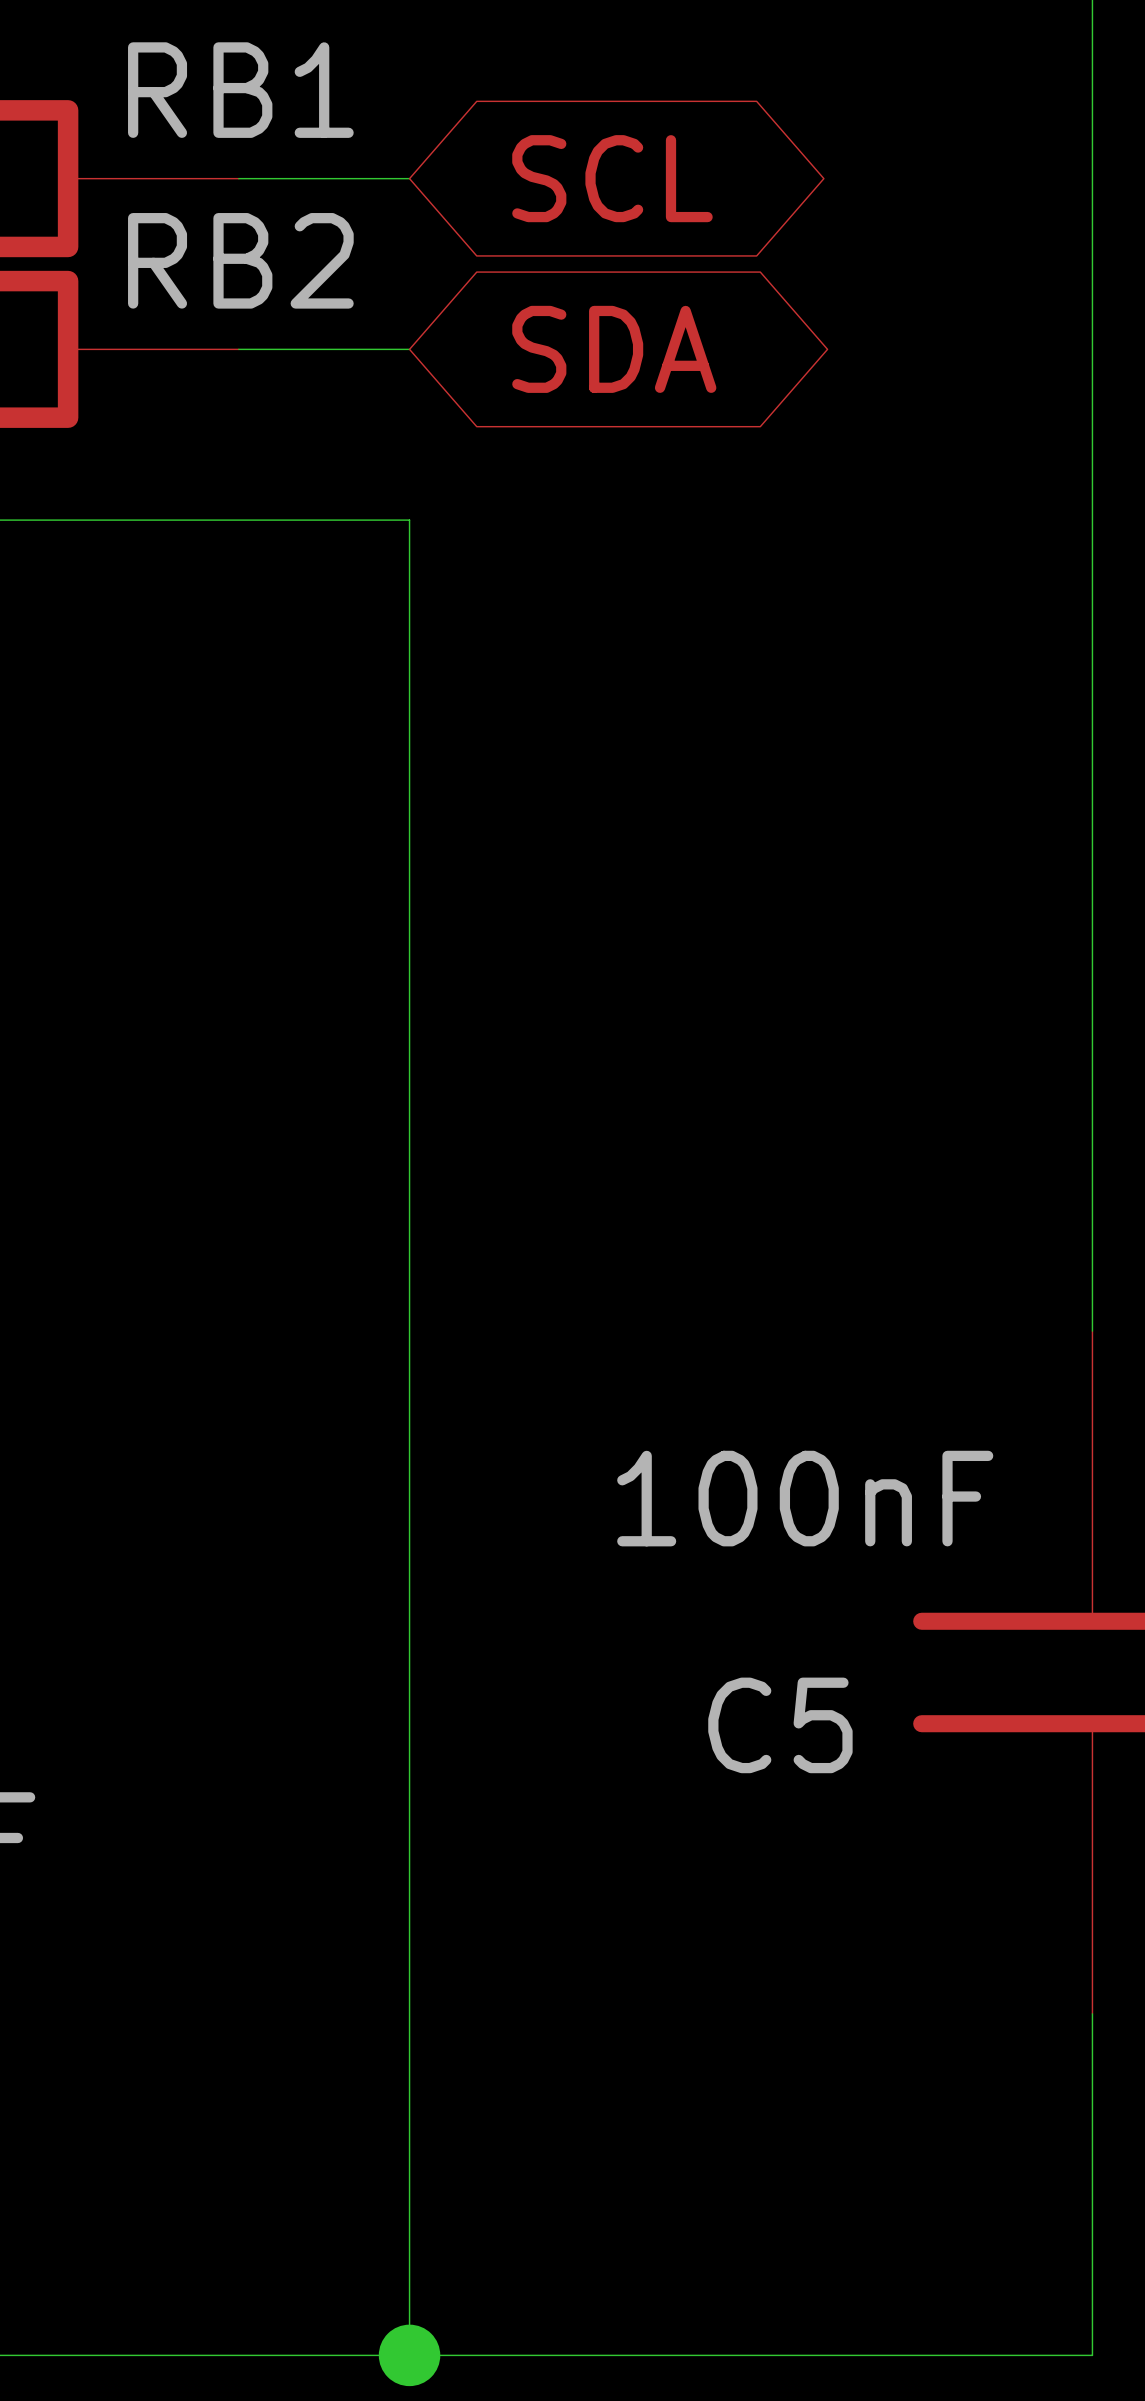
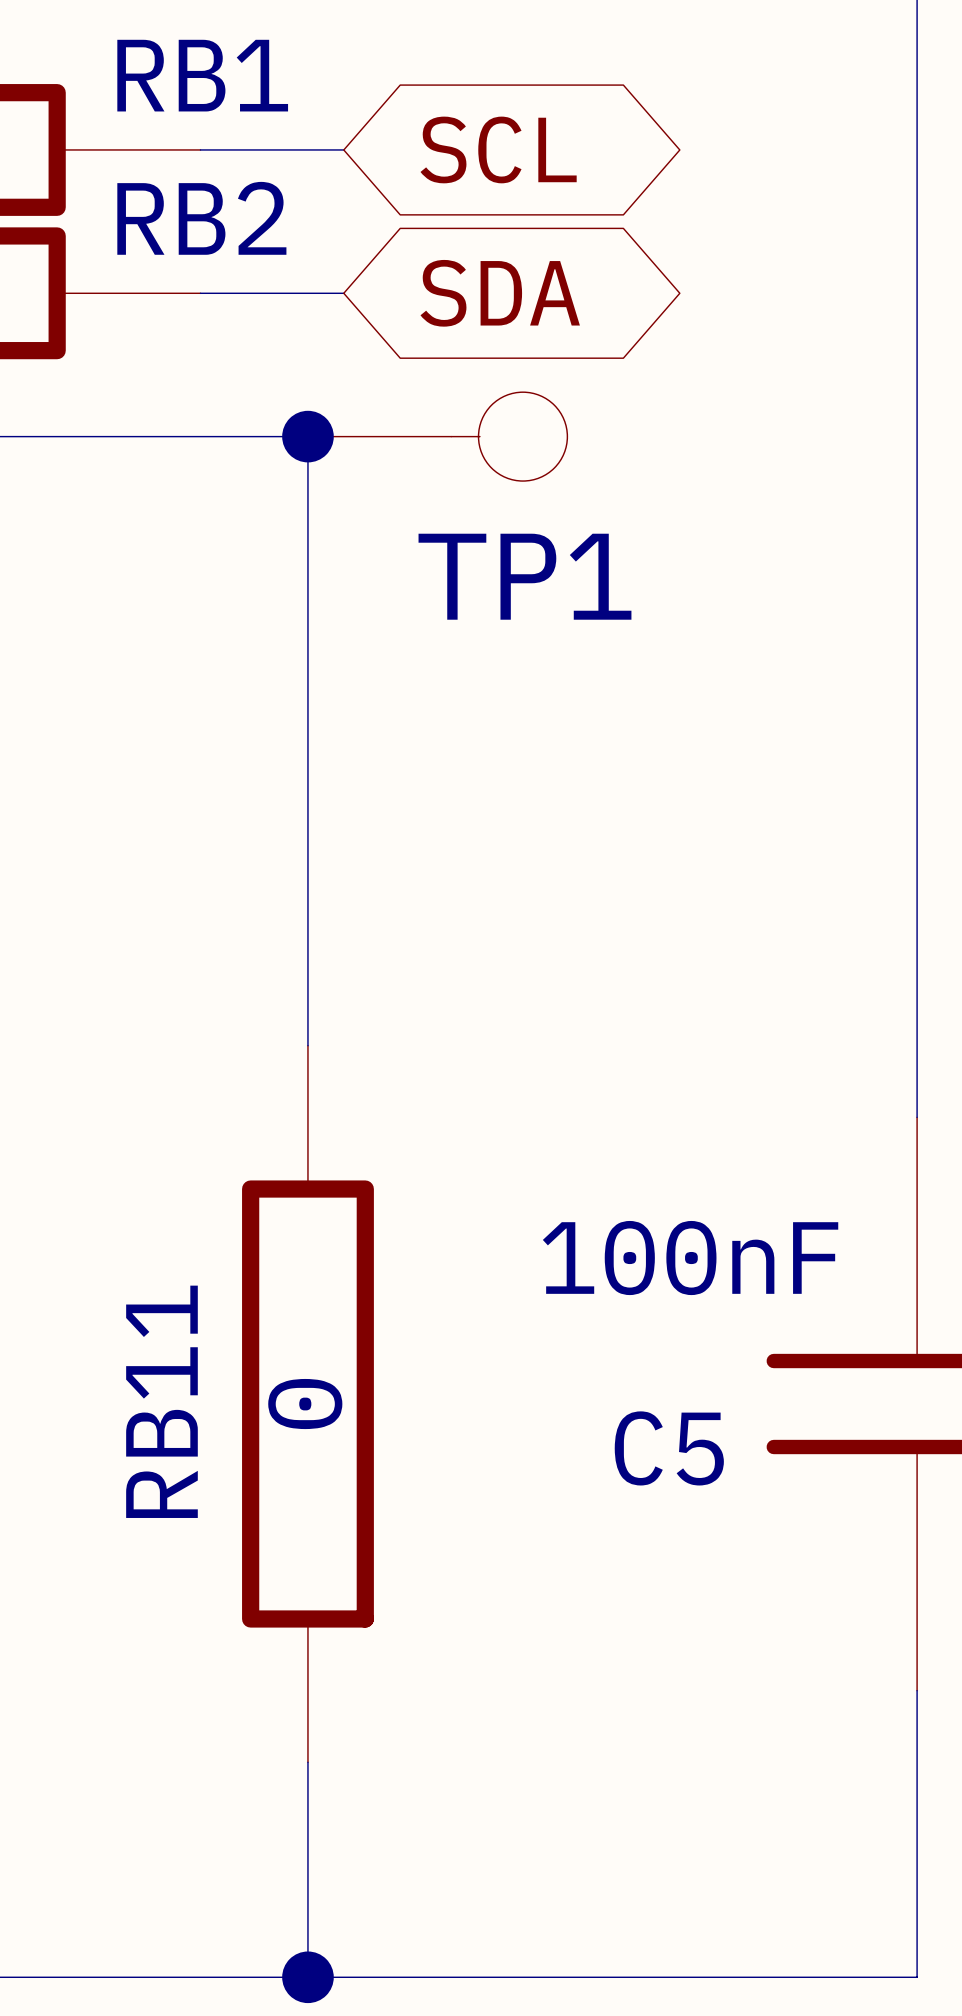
wire: (366, 520) (409, 520) (409, 2355) -> (307, 436) (307, 1045)
junction: none -> (307, 436)
TP1: none -> (437, 436)
RB11: none -> 0 (307, 1404)
wire: none -> (307, 1762) (307, 1977)
junction position: (409, 2355) -> (307, 1977)

